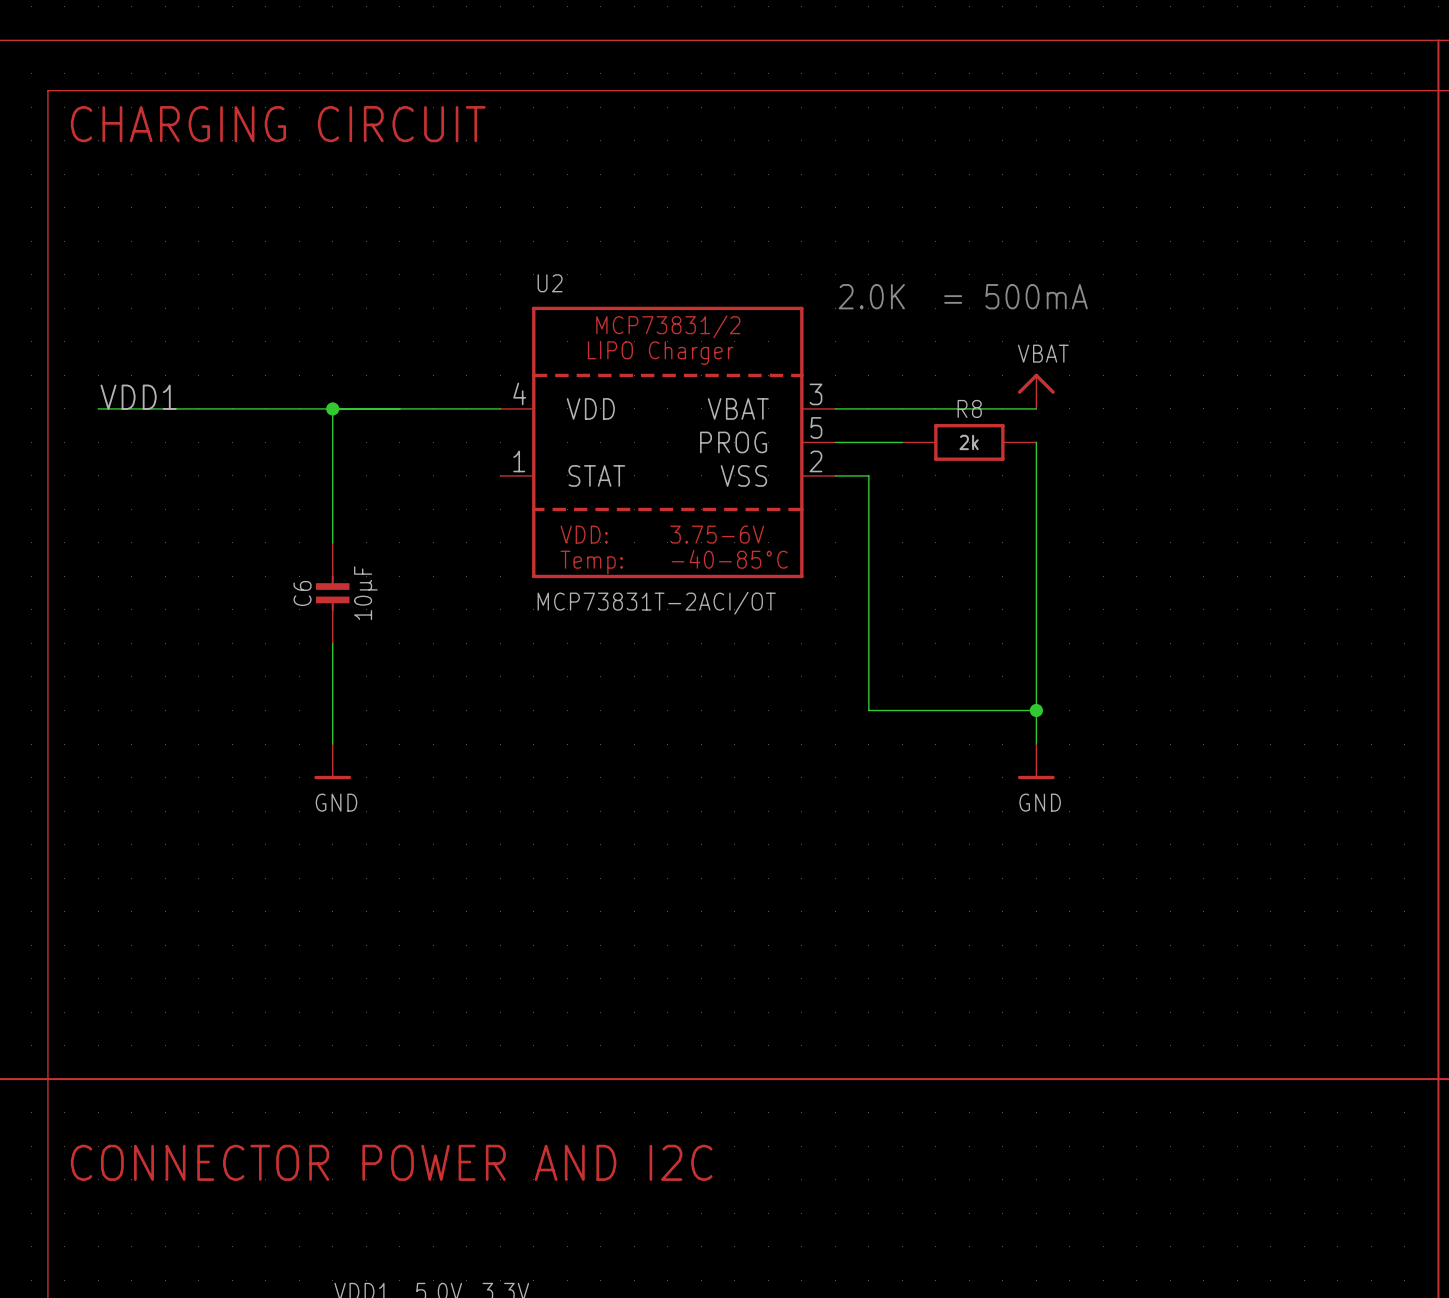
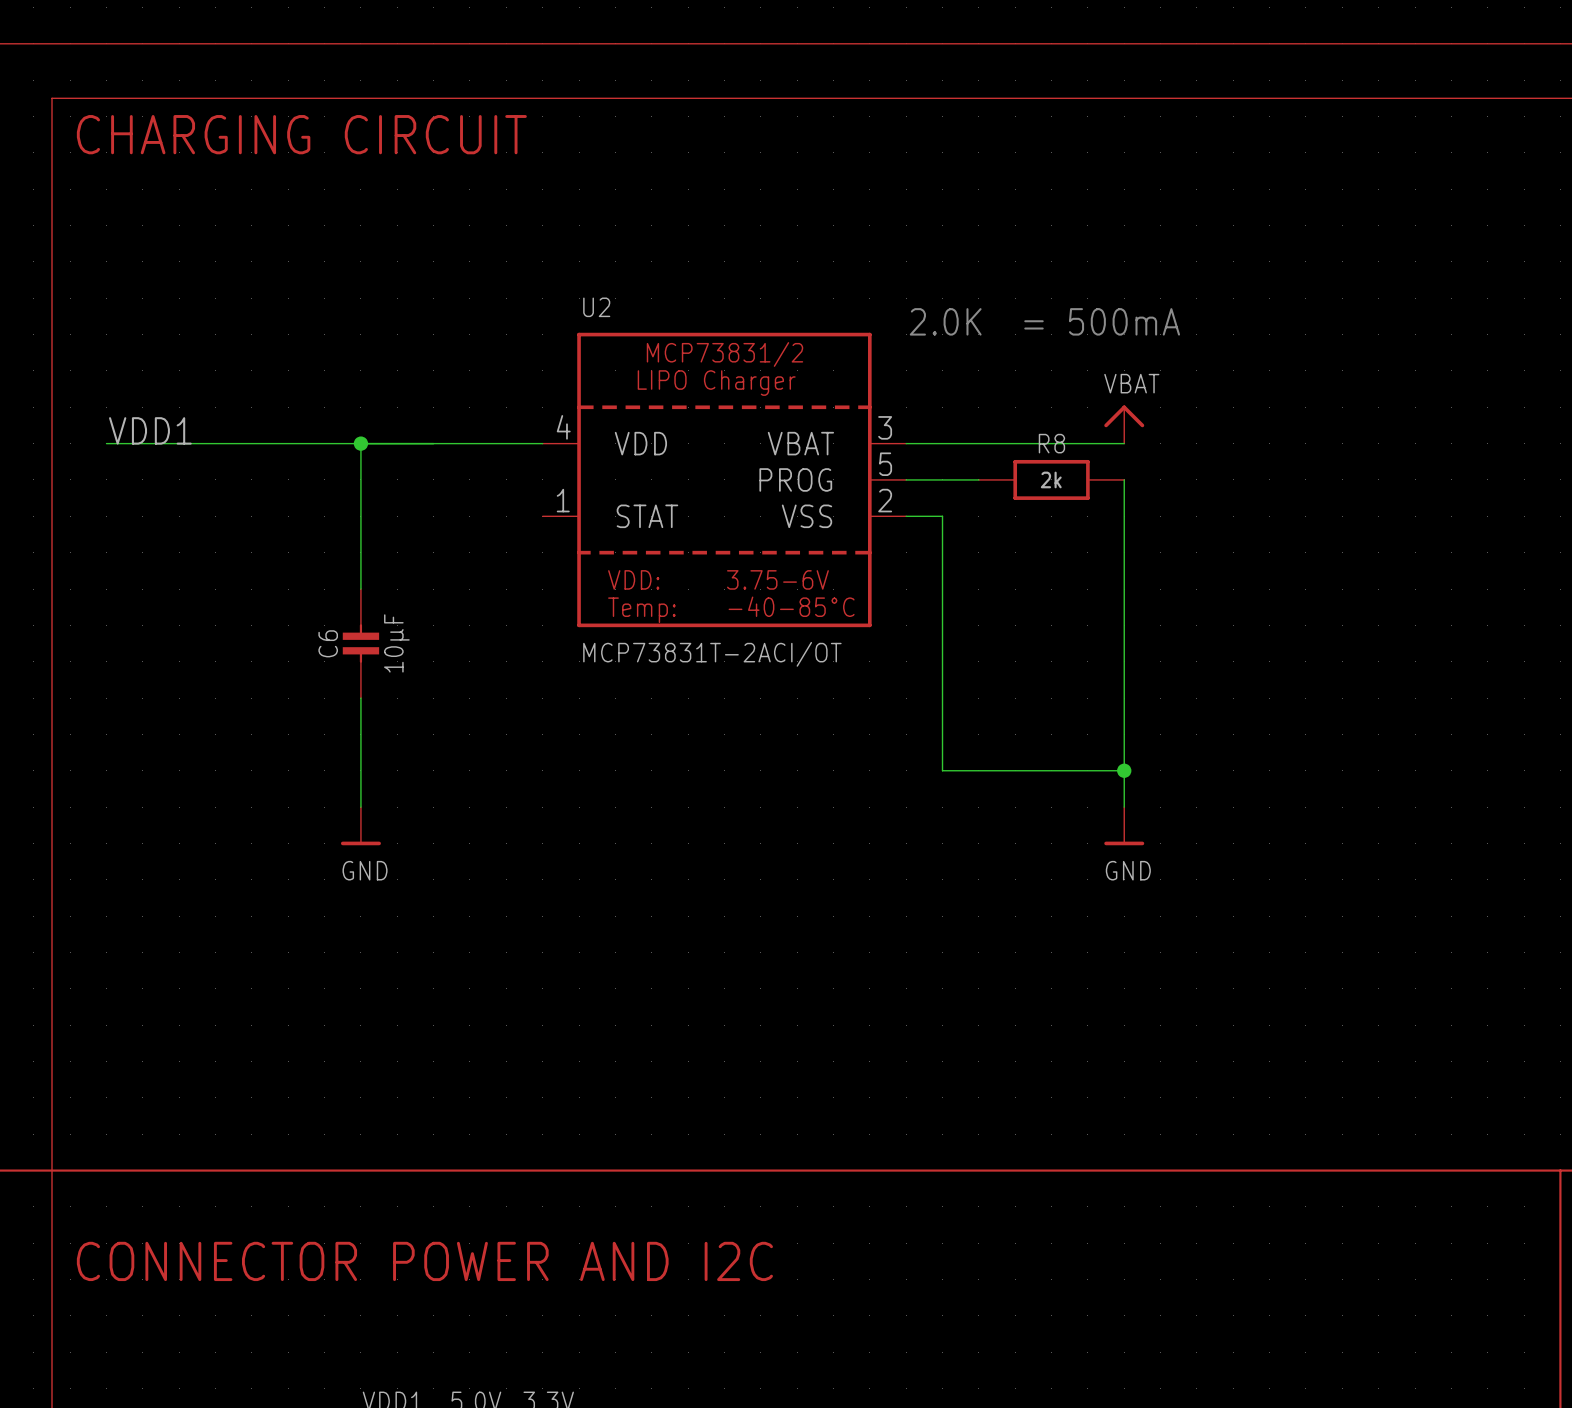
line: (1438, 40) (1438, 1079) -> none

